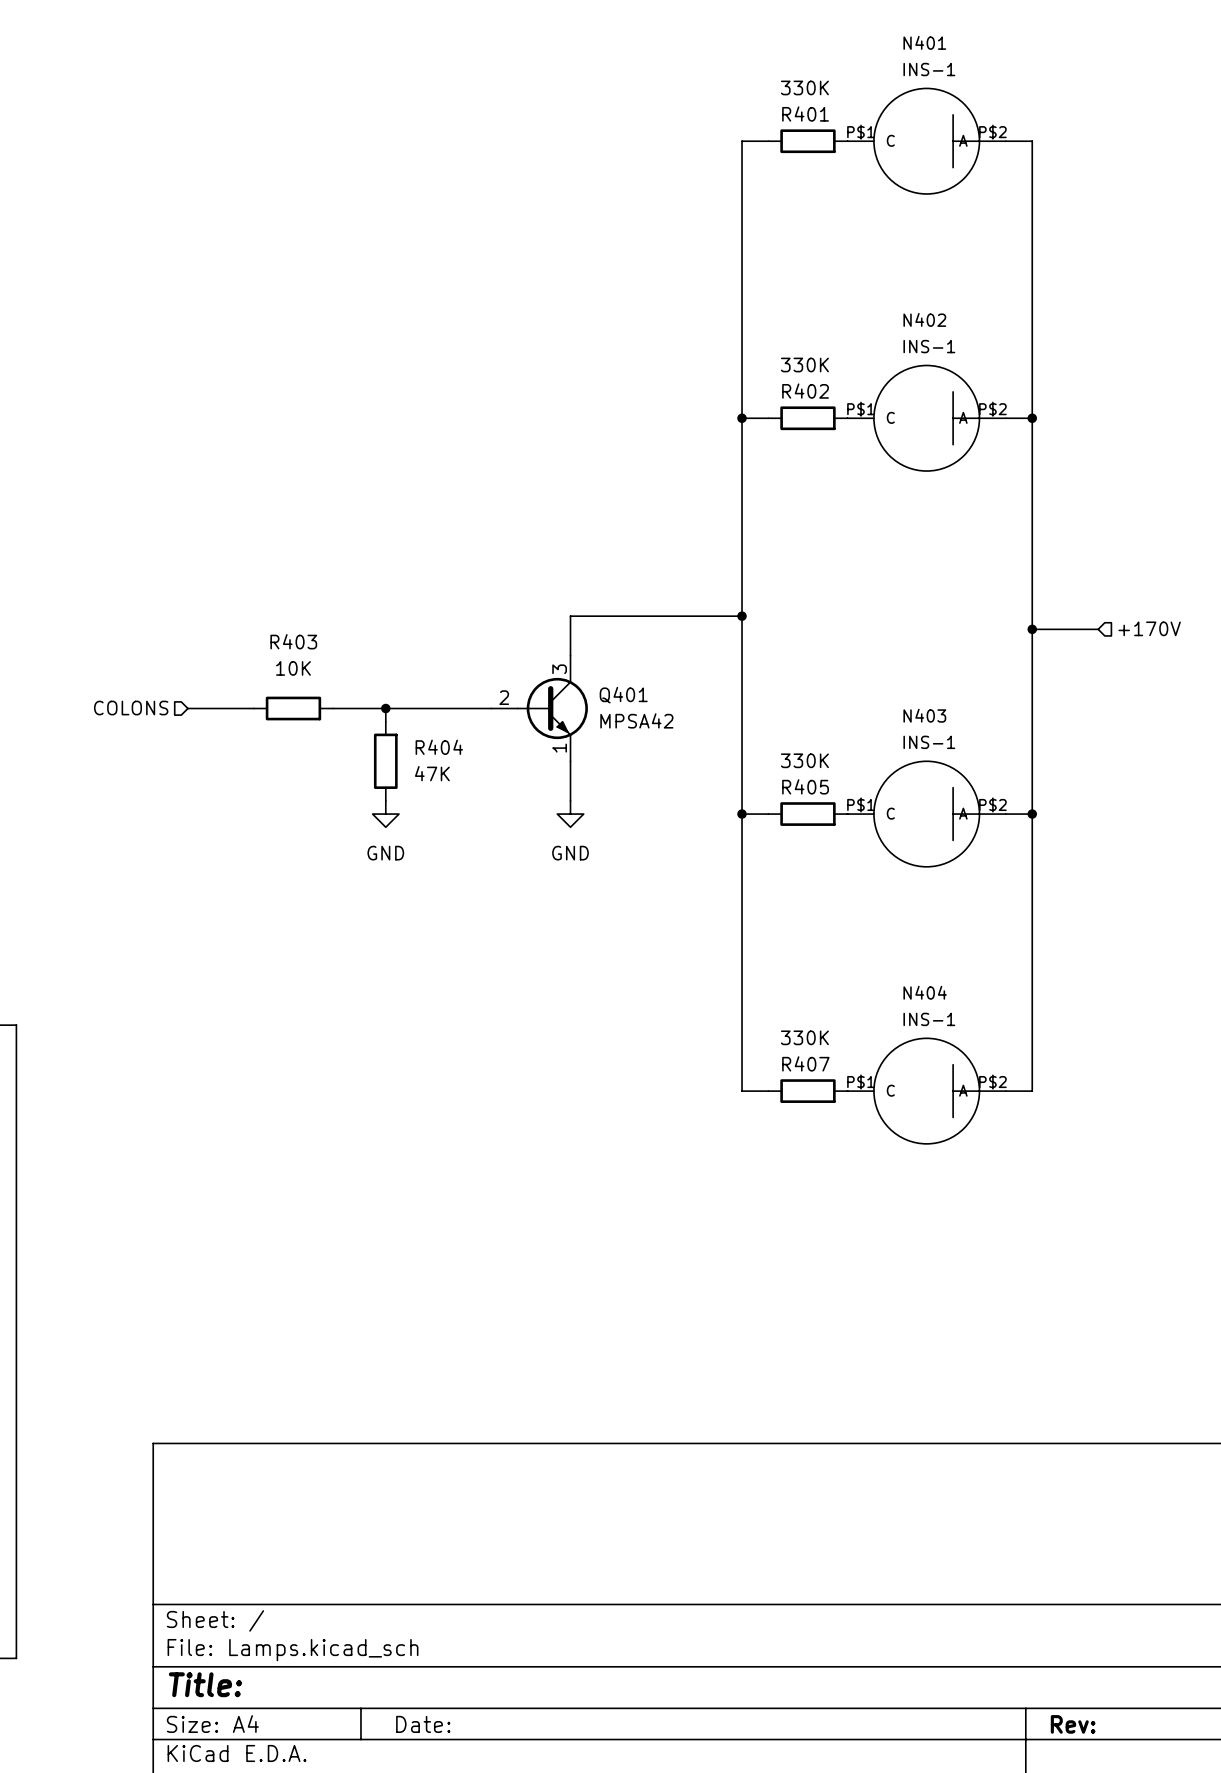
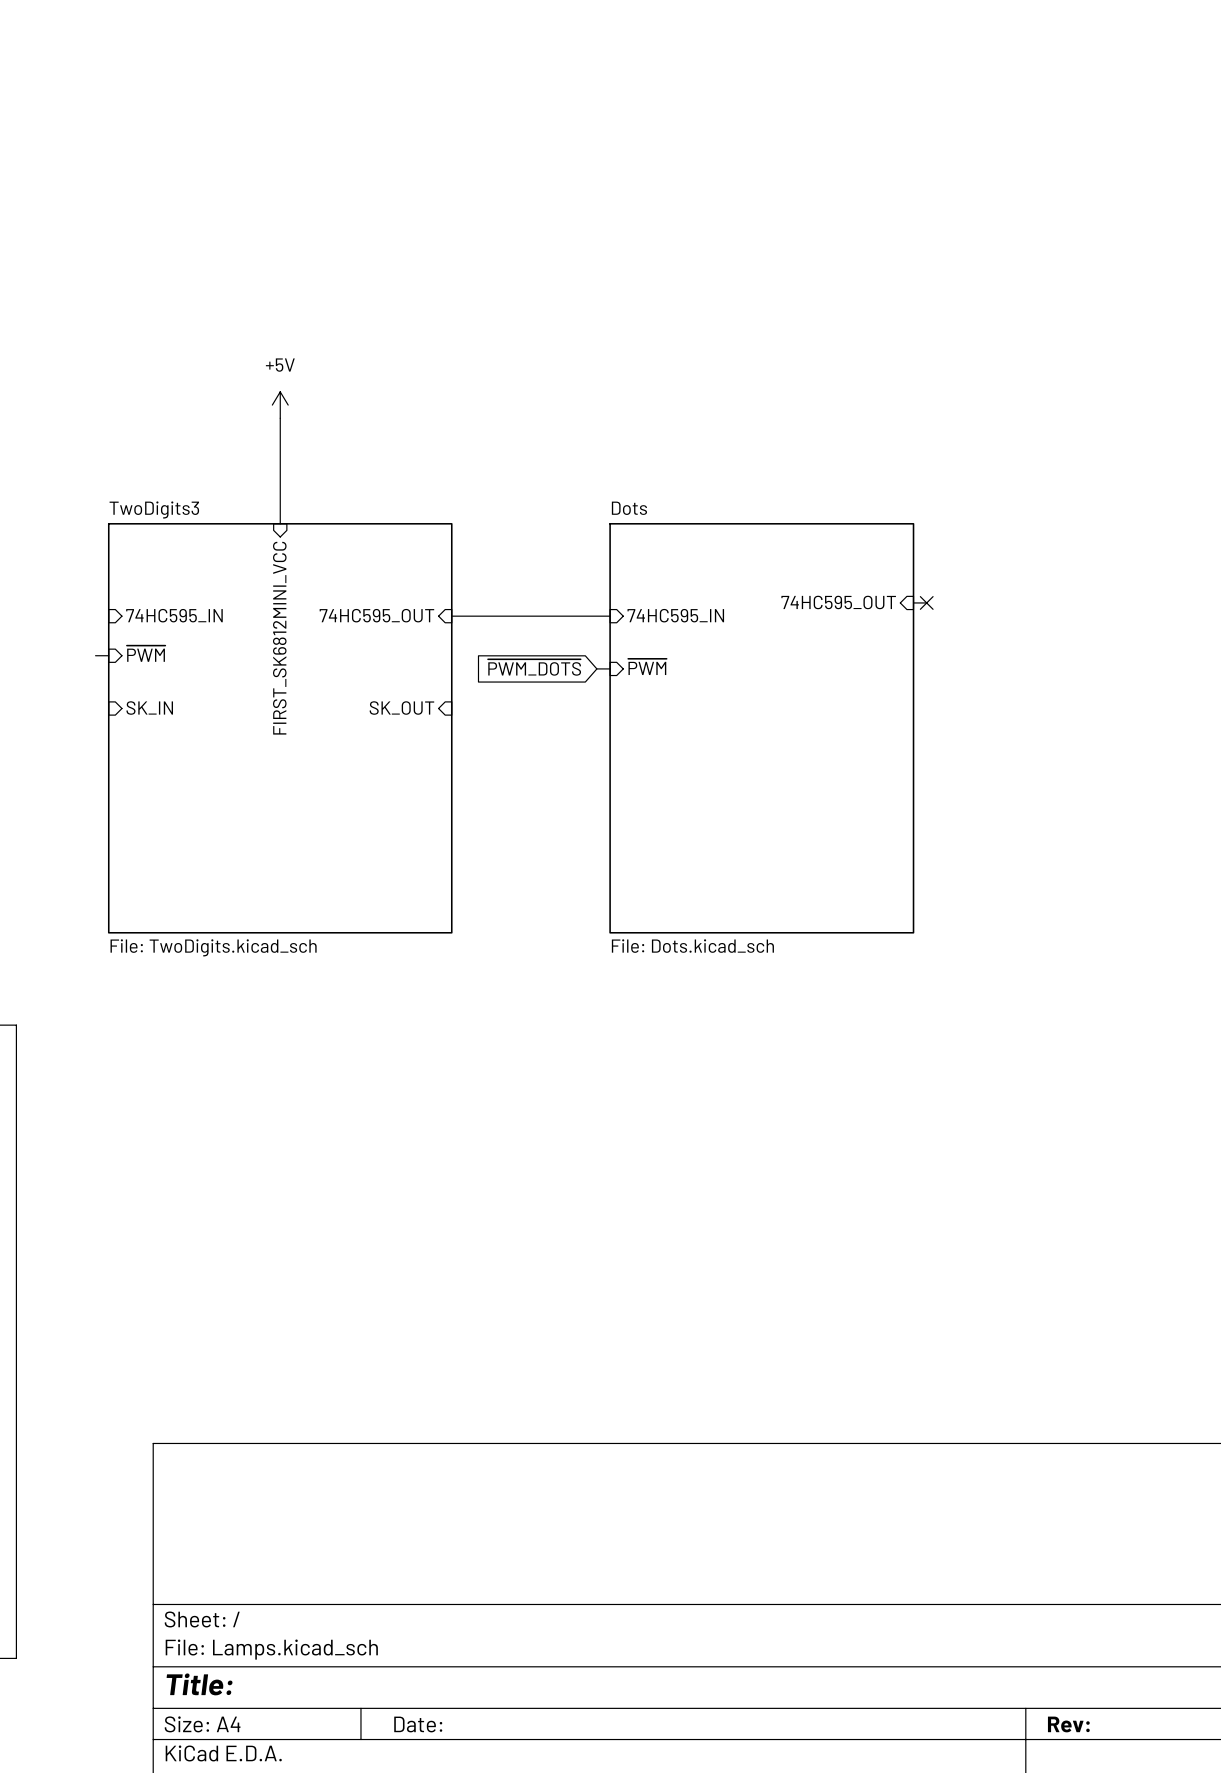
wire: (768, 141) (742, 141) (742, 1091) (768, 1091) -> none
R401: 330K (807, 141) -> none
N401: INS-1 (926, 141) -> none
wire: (1005, 141) (1032, 141) (1032, 1091) (1005, 1091) -> none
power symbol: none -> +5V (280, 405)
wire: none -> (280, 418) (280, 523)
wire: (742, 418) (768, 418) -> none
junction: (742, 418) -> none
R402: 330K (807, 418) -> none
N402: INS-1 (926, 418) -> none
wire: (1005, 418) (1032, 418) -> none
junction: (1032, 418) -> none
sheet pin: none -> 74HC595_OUT (838, 602)
wire: none -> (913, 602) (926, 602)
no-connect mark: none -> (926, 602)
sheet pin: none -> 74HC595_IN (174, 615)
sheet pin: none -> 74HC595_OUT (376, 615)
sheet pin: none -> 74HC595_IN (675, 615)
wire: (570, 616) (570, 655) -> (570, 616) (451, 616)
wire: (610, 616) (742, 616) -> none
junction: (742, 616) -> none
hierarchical label: +170V (1149, 628) -> none
wire: (1032, 629) (1098, 629) -> none
junction: (1032, 629) -> none
sheet pin: none -> ~{PWM} (146, 653)
wire: none -> (95, 655) (108, 655)
sheet pin: none -> FIRST_SK6812MINI_VCC (279, 638)
sheet pin: none -> ~{PWM} (647, 666)
global label: none -> ~{PWM_DOTS} (534, 667)
wire: none -> (596, 668) (610, 668)
hierarchical label: COLONS (131, 708) -> none
sheet pin: none -> SK_IN (149, 708)
wire: (187, 708) (253, 708) -> none
R403: 10K (293, 708) -> none
wire: (333, 708) (491, 708) -> none
wire: (385, 708) (385, 721) -> none
junction: (385, 708) -> none
sheet pin: none -> SK_OUT (401, 708)
Q401: MPSA42 (539, 708) -> none
sheet TwoDigits3: none -> File: TwoDigits.kicad_sch (280, 728)
sheet Dots: none -> File: Dots.kicad_sch (761, 728)
R404: 47K (385, 761) -> none
wire: (570, 761) (570, 800) -> none
power symbol: GND (385, 814) -> none
power symbol: GND (570, 814) -> none
wire: (742, 814) (768, 814) -> none
junction: (742, 814) -> none
R405: 330K (807, 814) -> none
N403: INS-1 (926, 814) -> none
wire: (1005, 814) (1032, 814) -> none
junction: (1032, 814) -> none
R407: 330K (807, 1091) -> none
N404: INS-1 (926, 1091) -> none

